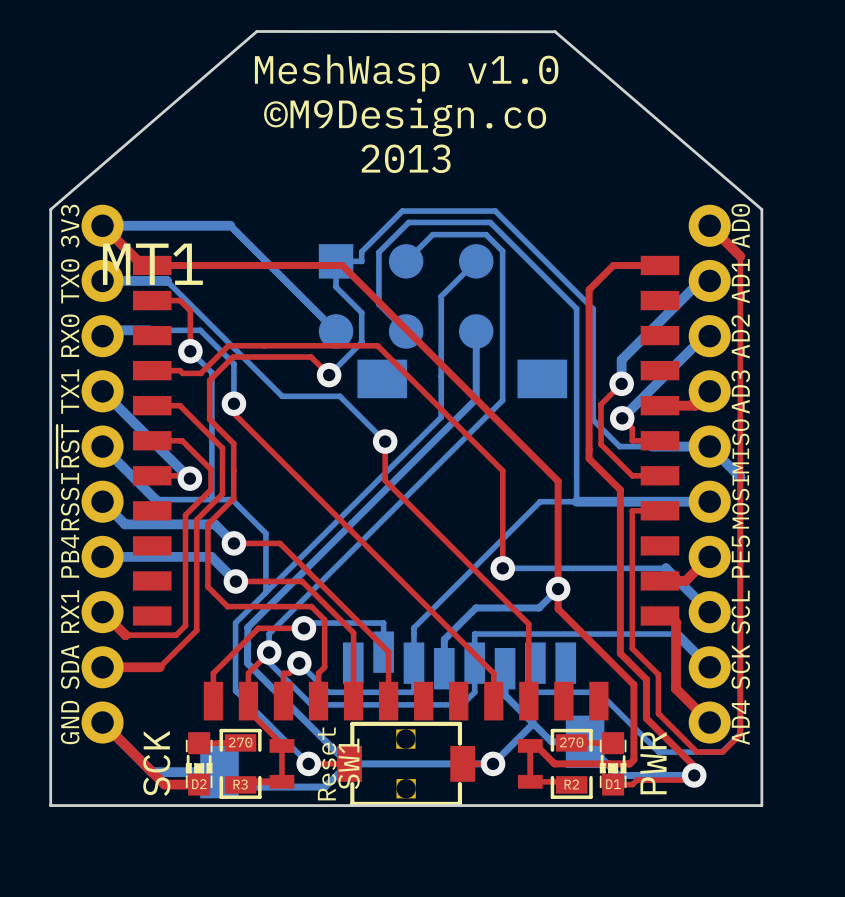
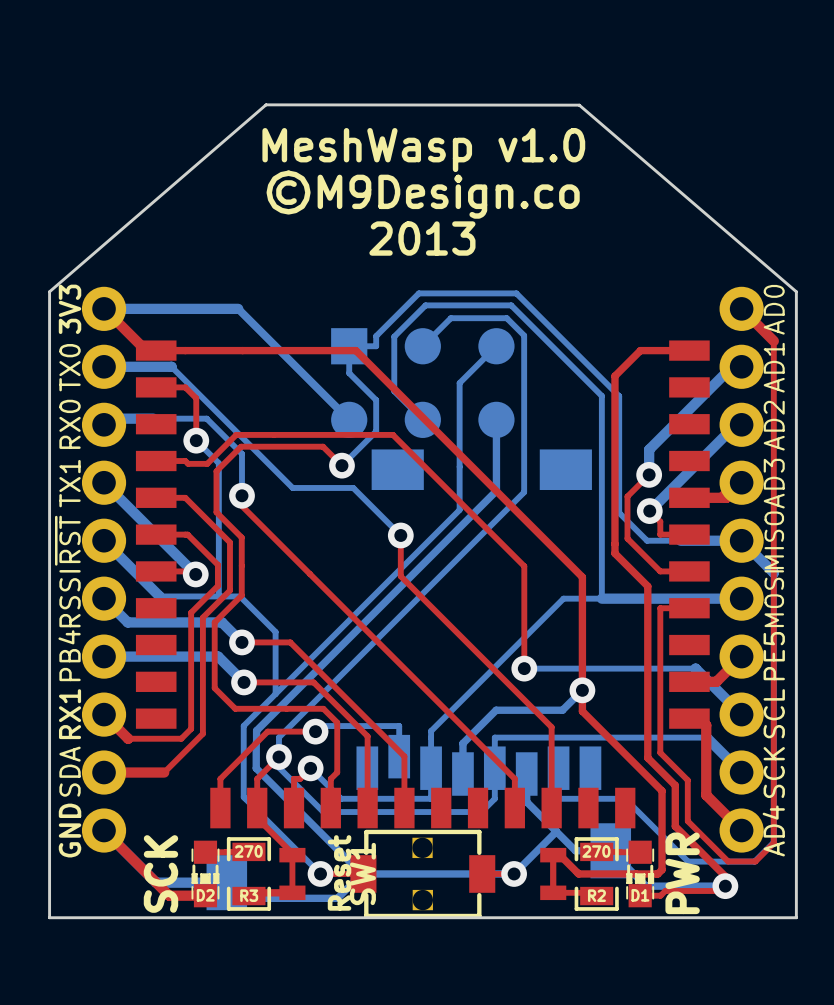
MT1 name: MT1 (152, 264) -> none

